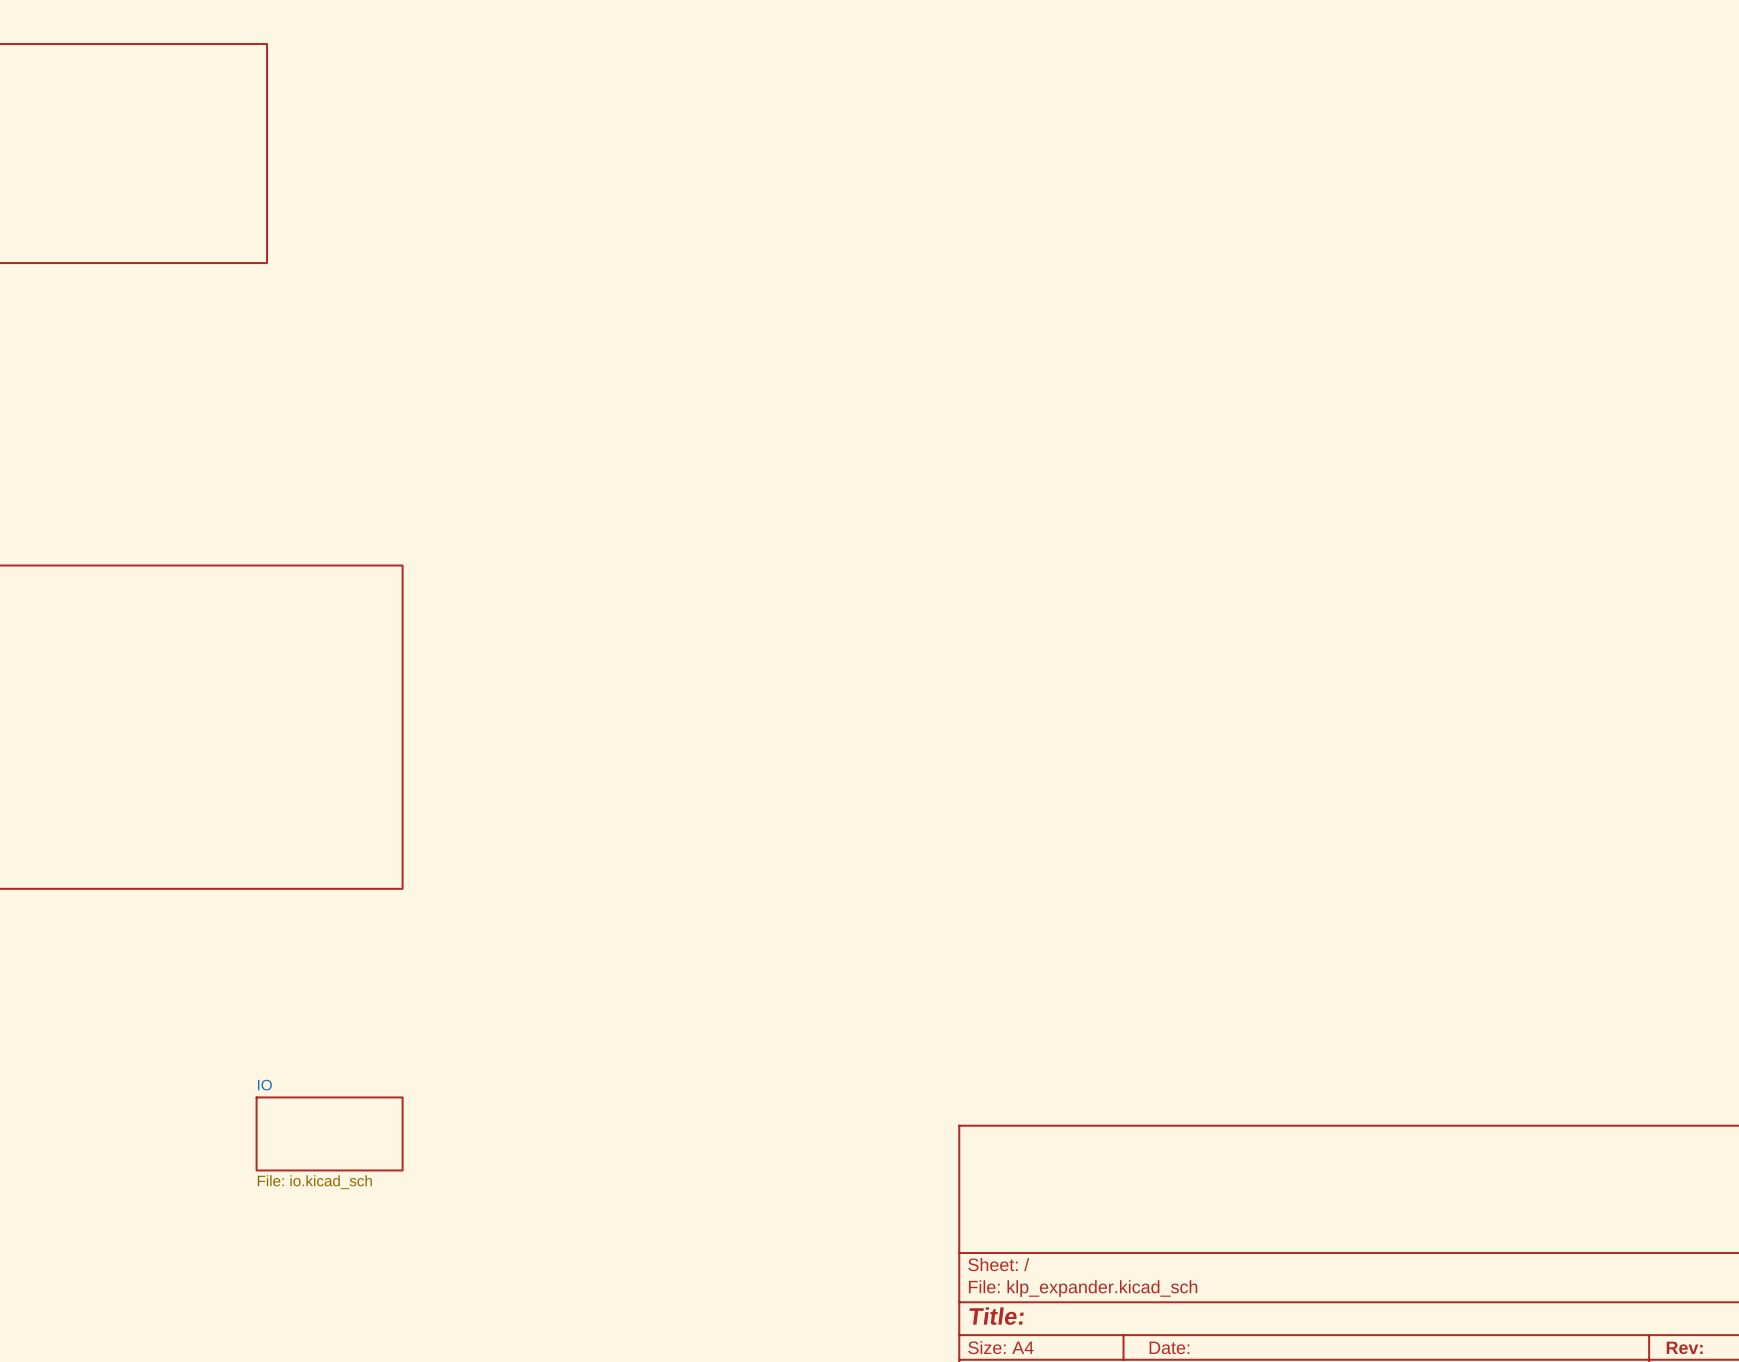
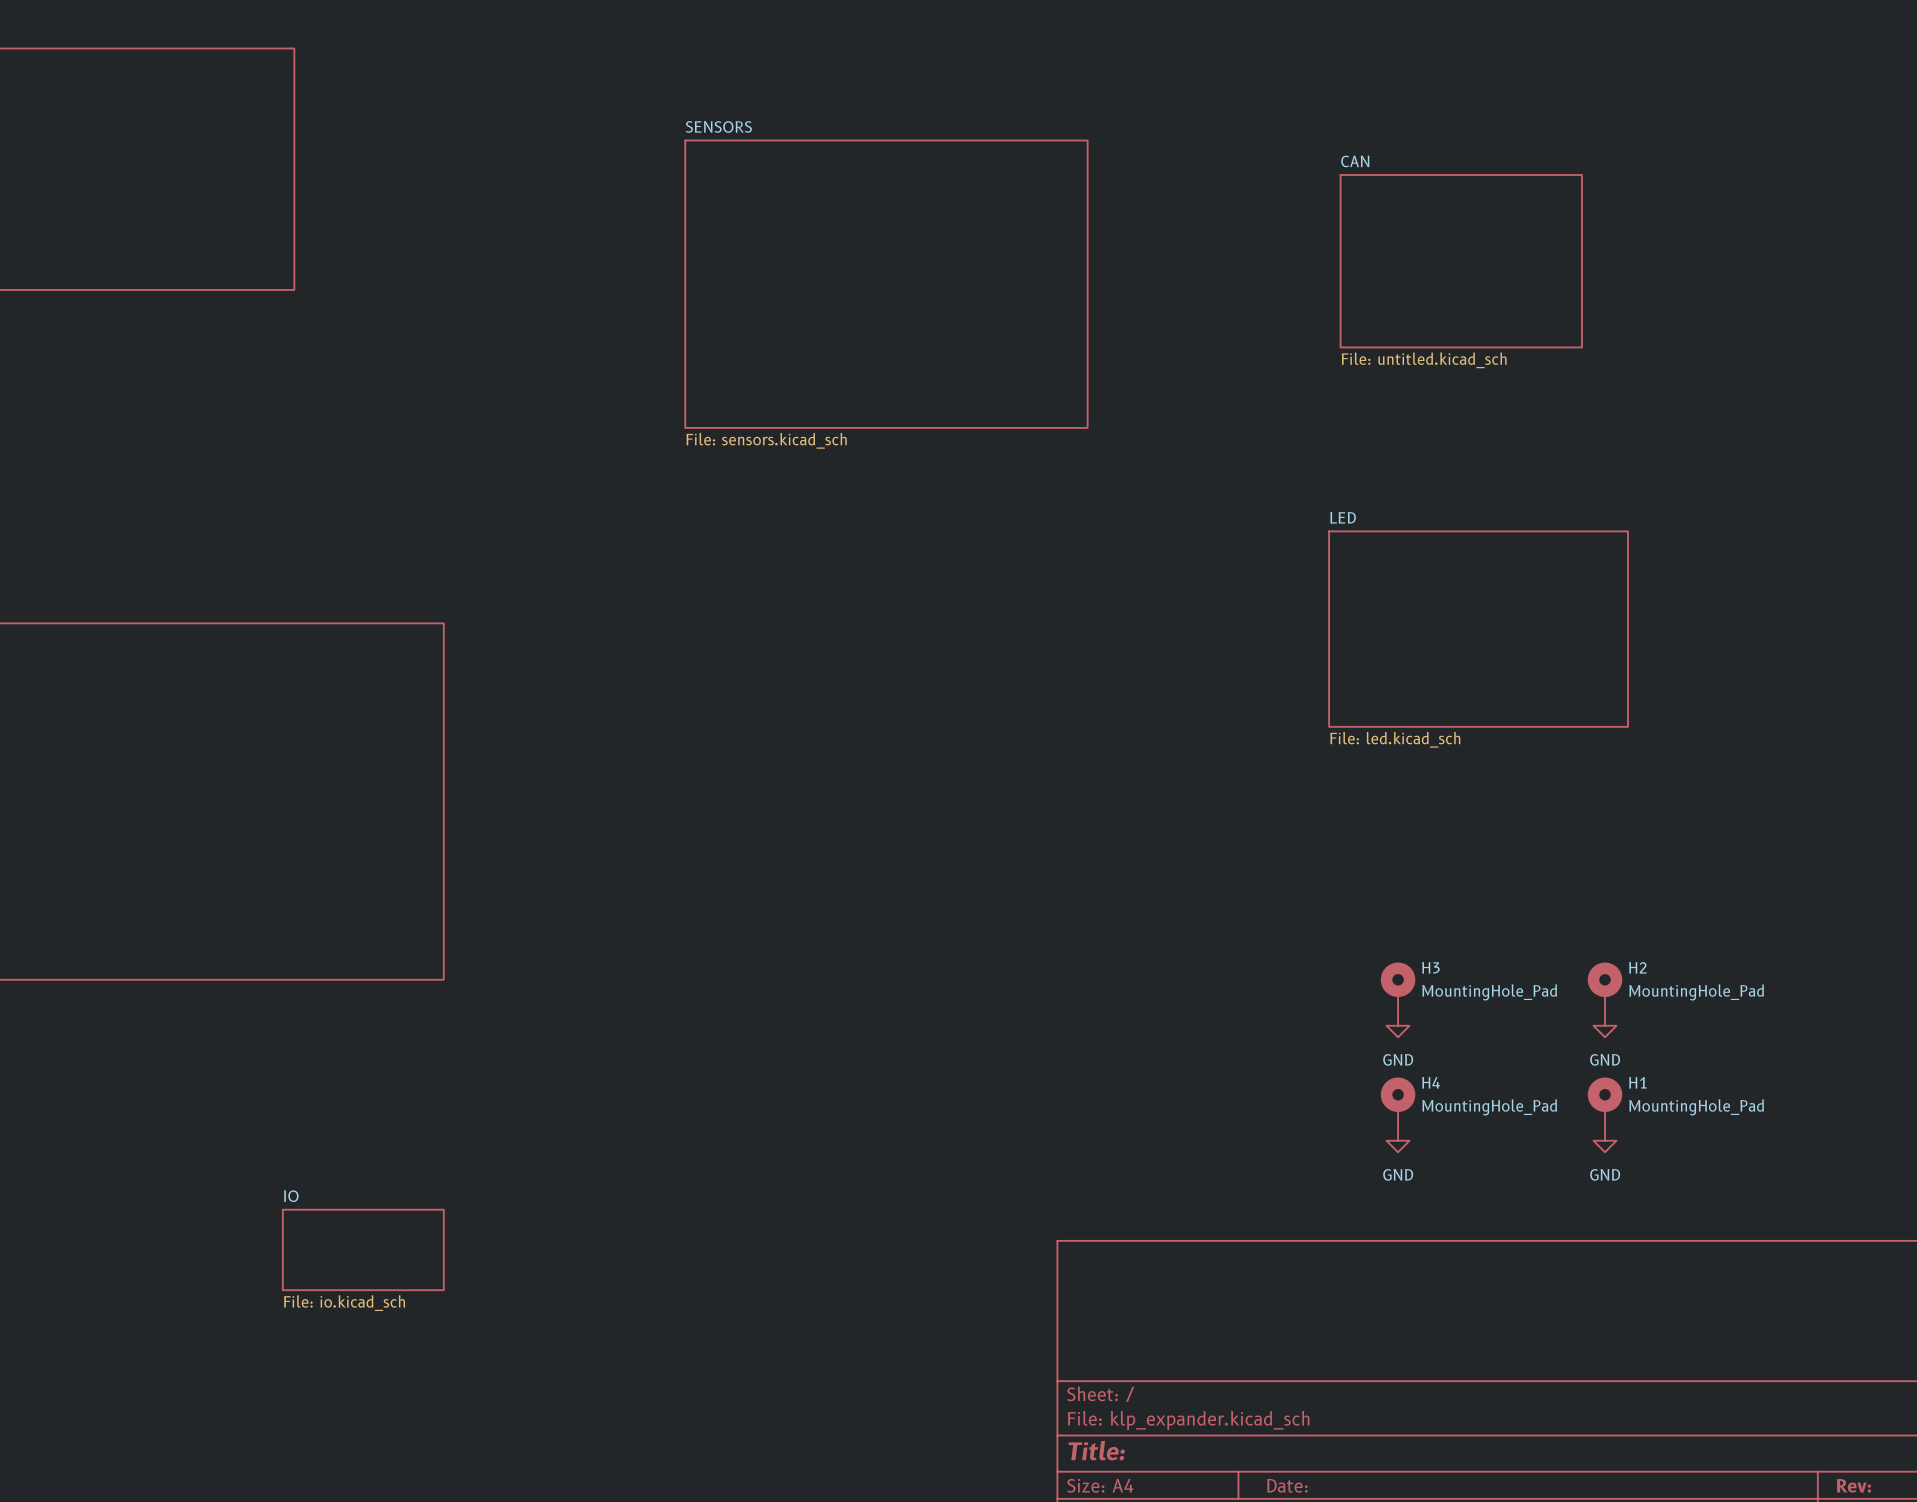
sheet CAN: none -> File: untitled.kicad_sch (1461, 261)
sheet SENSORS: none -> File: sensors.kicad_sch (886, 284)
sheet LED: none -> File: led.kicad_sch (1478, 629)
H3: none -> MountingHole_Pad (1398, 988)
H2: none -> MountingHole_Pad (1605, 988)
power symbol: none -> GND (1398, 1025)
power symbol: none -> GND (1605, 1025)
H4: none -> MountingHole_Pad (1398, 1103)
H1: none -> MountingHole_Pad (1605, 1103)
power symbol: none -> GND (1398, 1140)
power symbol: none -> GND (1605, 1140)

